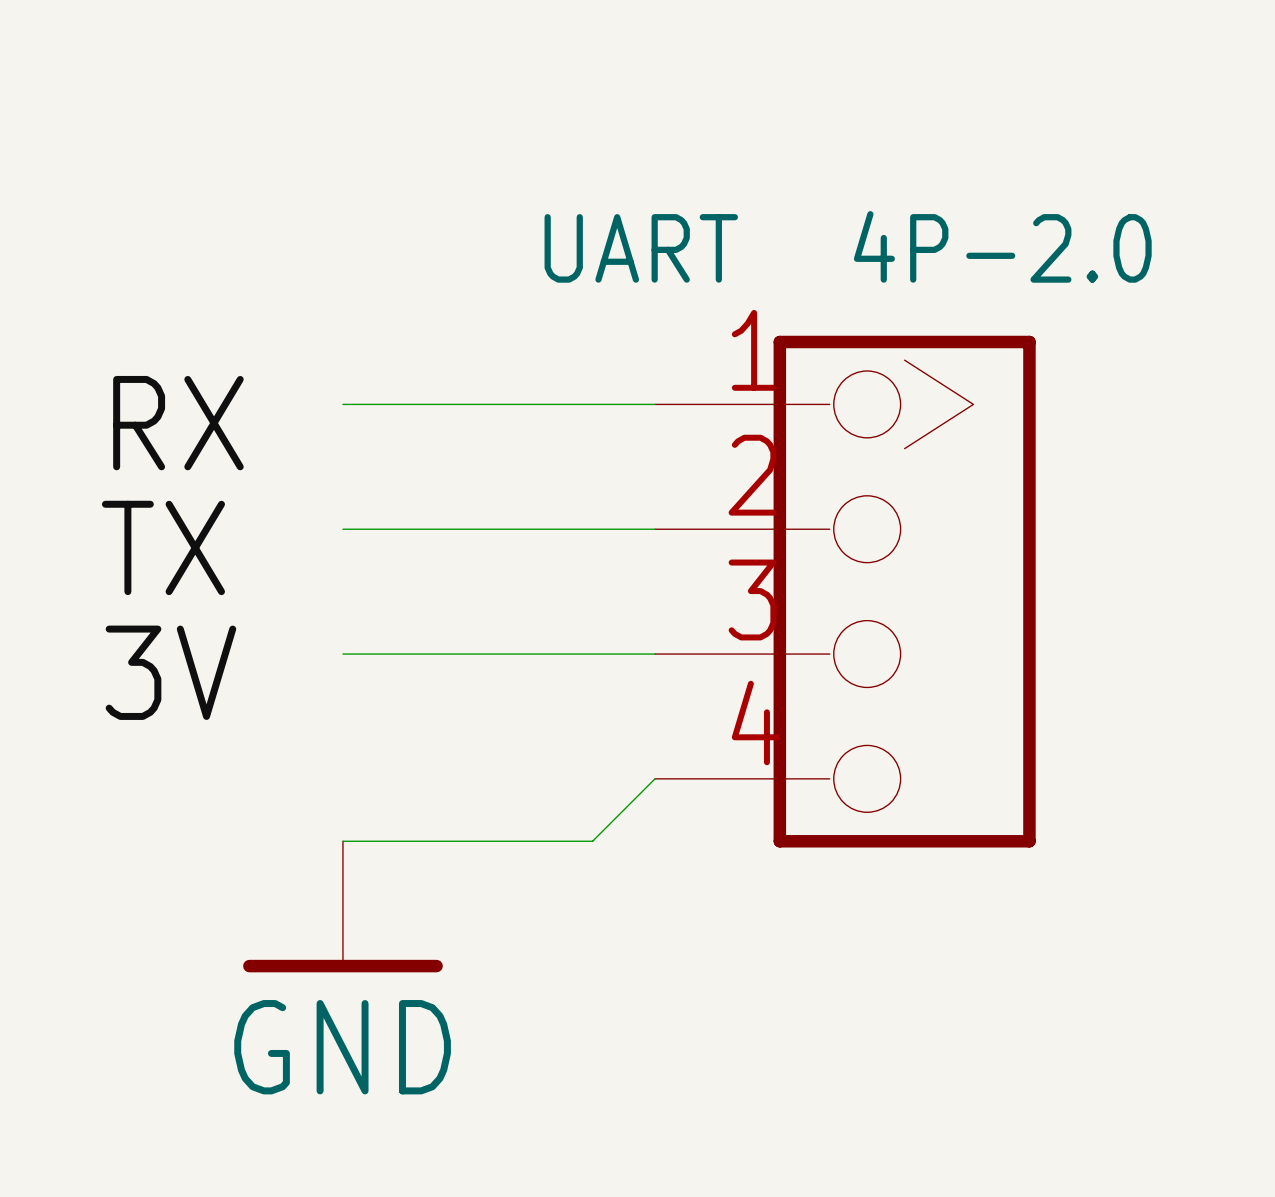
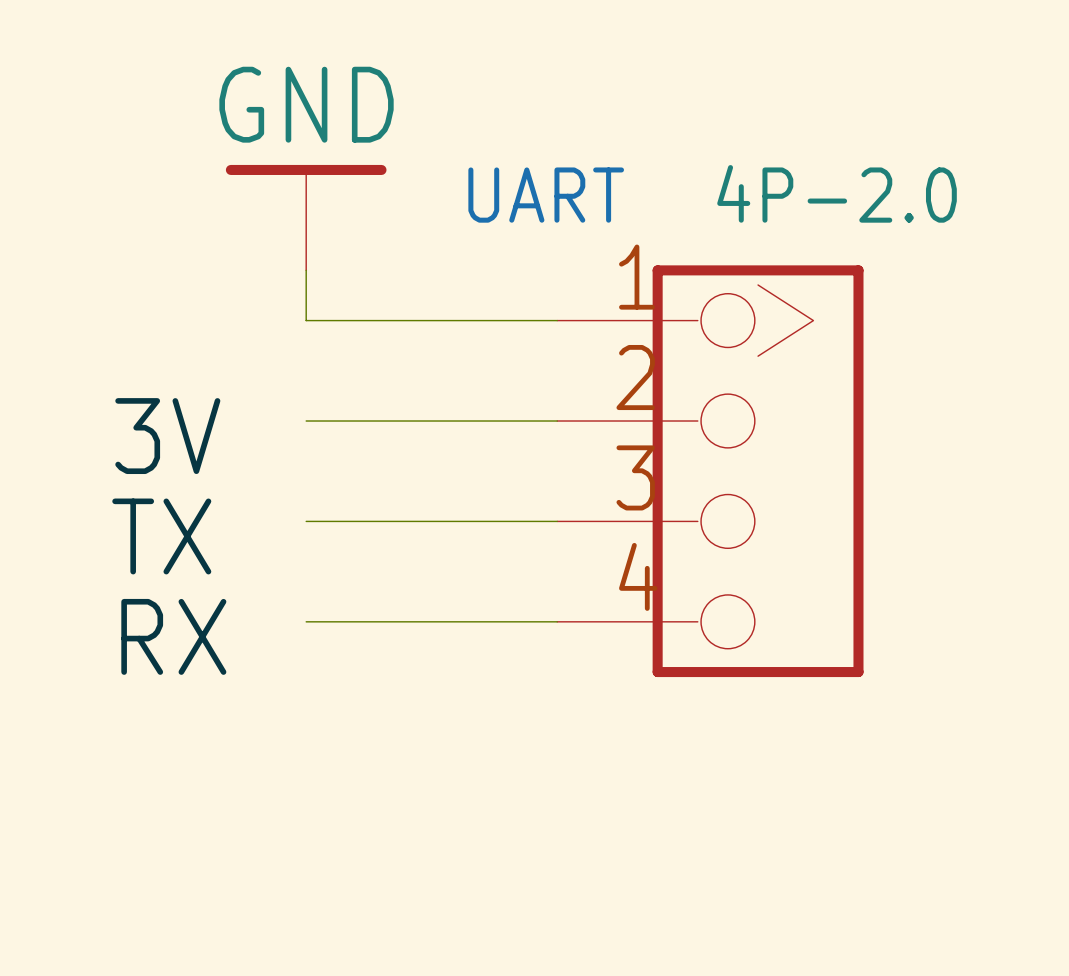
wire: none -> (306, 270) (306, 320)
label position: RX (178, 423) -> RX (173, 636)
label: TX (163, 547) -> 3V (167, 436)
label: 3V (170, 672) -> TX (161, 536)
wire: (655, 778) (592, 841) (342, 841) -> (557, 621) (306, 621)
power symbol position: GND (342, 906) -> GND (306, 217)
power symbol rotation: 0° (342, 966) -> 180° (306, 169)

